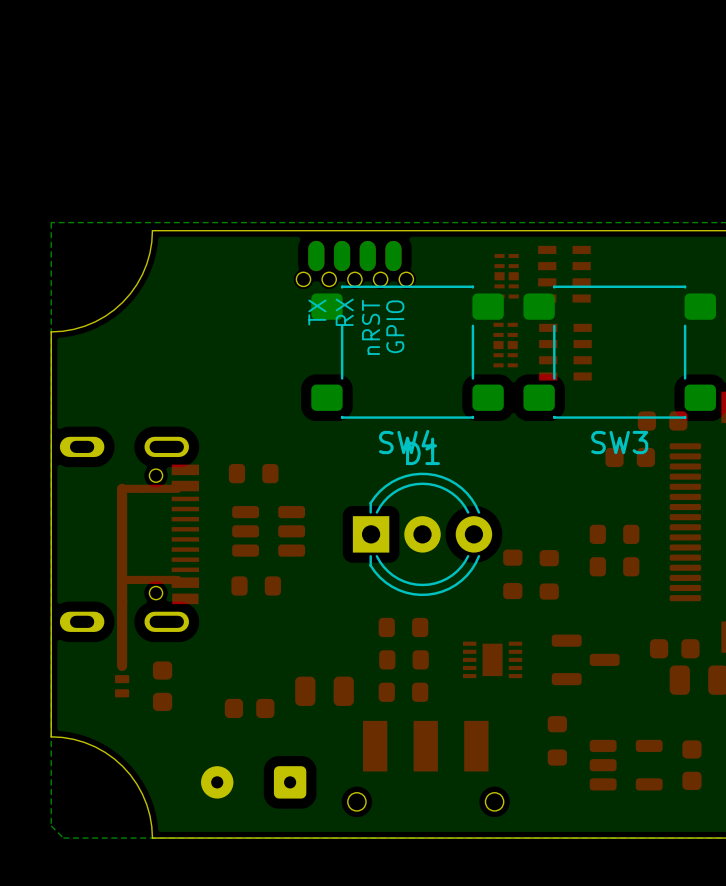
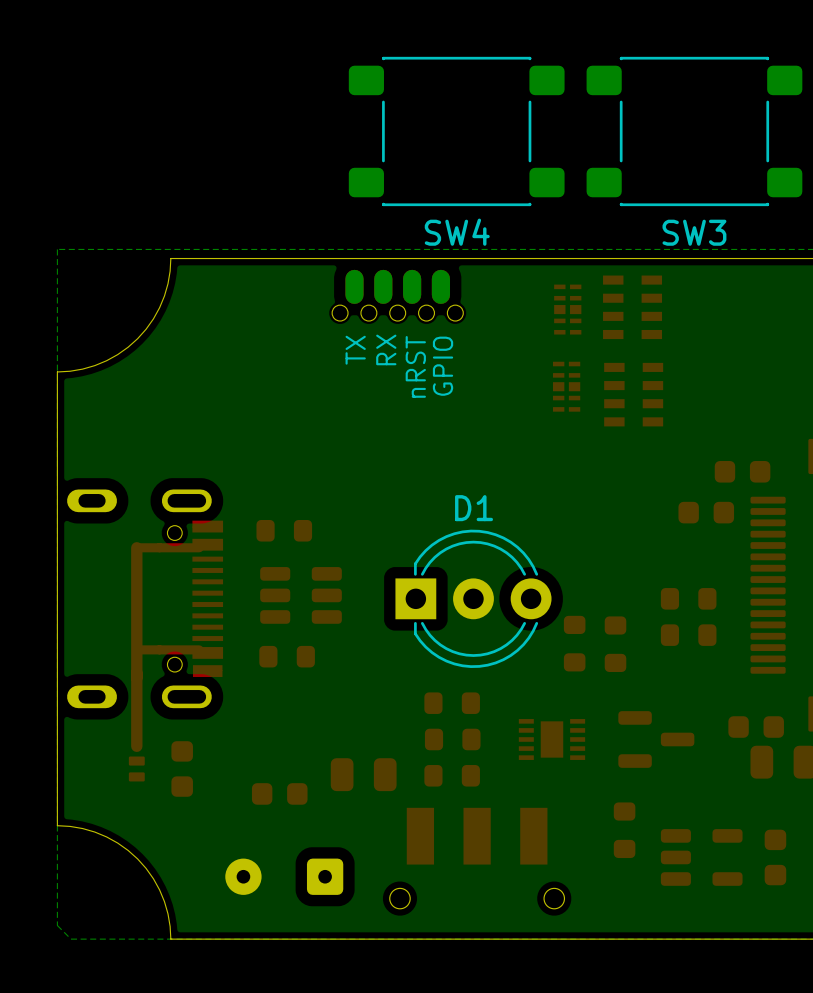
SW4 position: (407, 352) -> (456, 131)
SW3 position: (619, 352) -> (694, 131)

